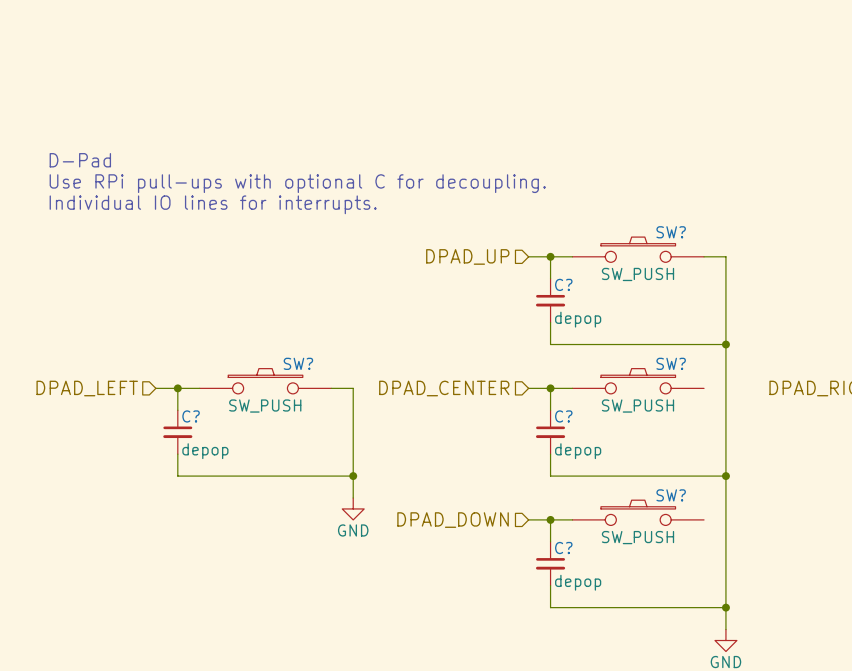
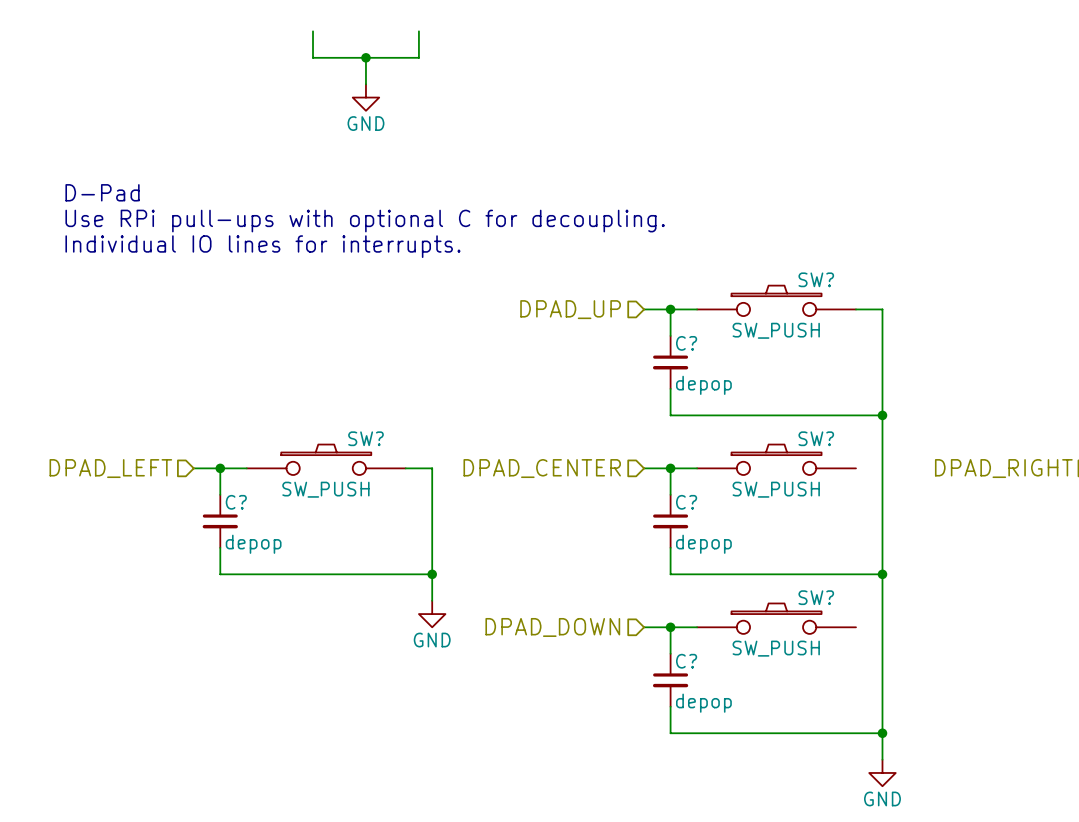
wire: none -> (313, 31) (313, 57) (418, 57) (418, 31)
wire: none -> (365, 57) (365, 84)
junction: none -> (365, 57)
power symbol: none -> GND (365, 97)

